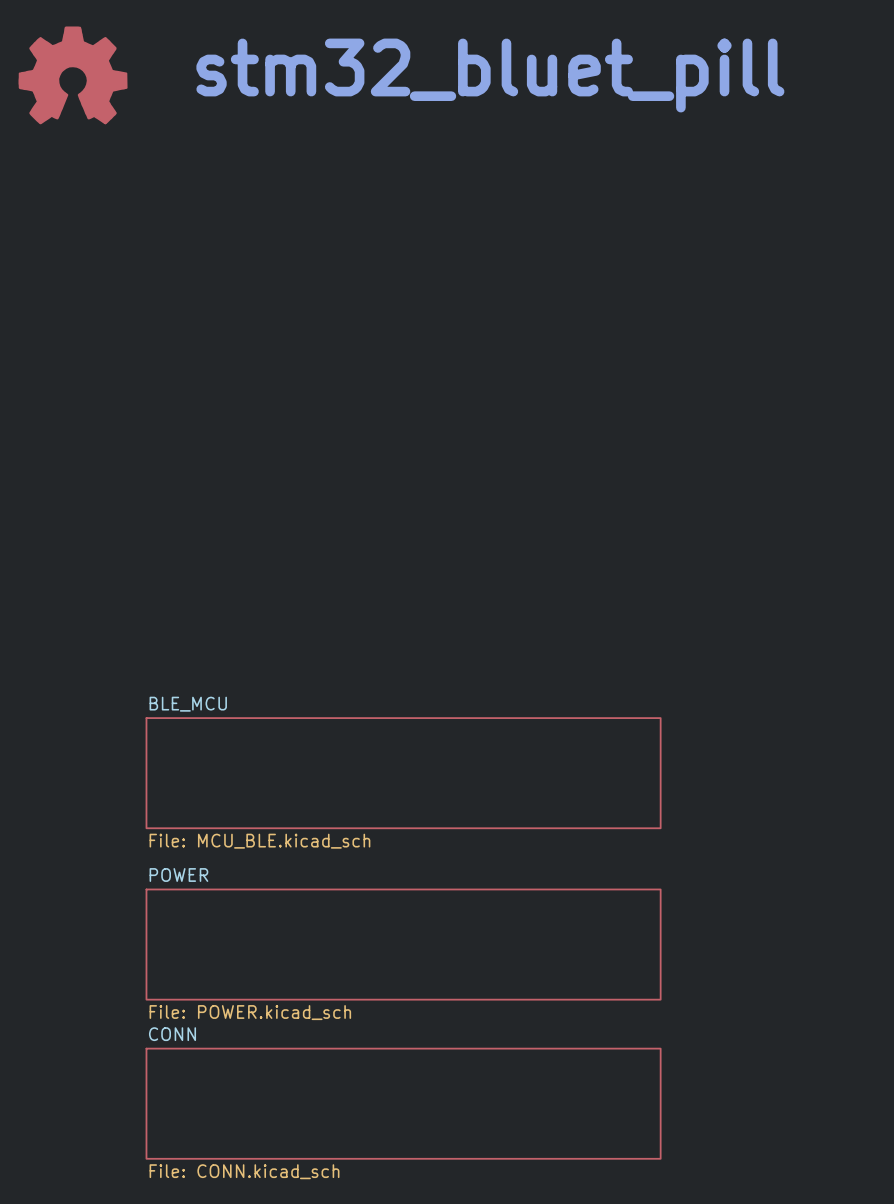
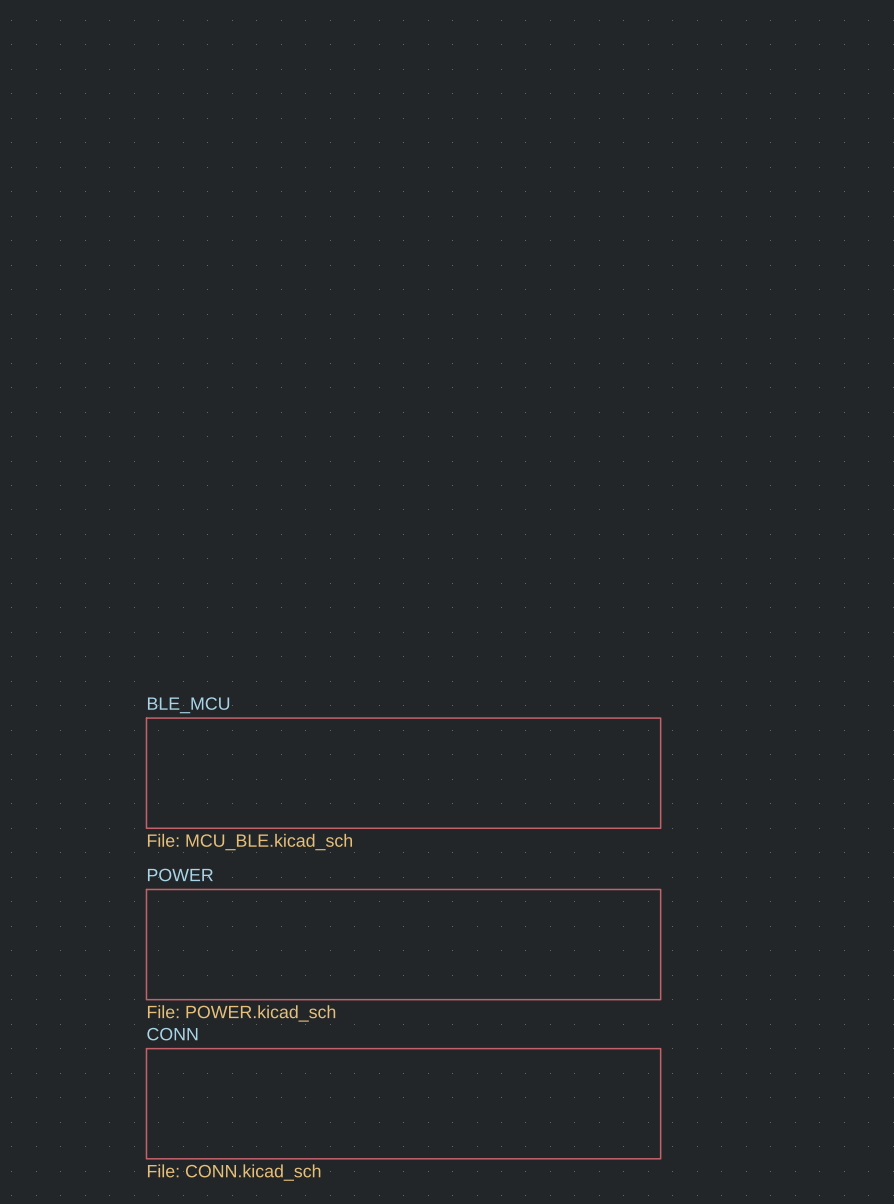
power symbol: (73, 75) -> none
text: stm32_bluet_pill (490, 75) -> none

